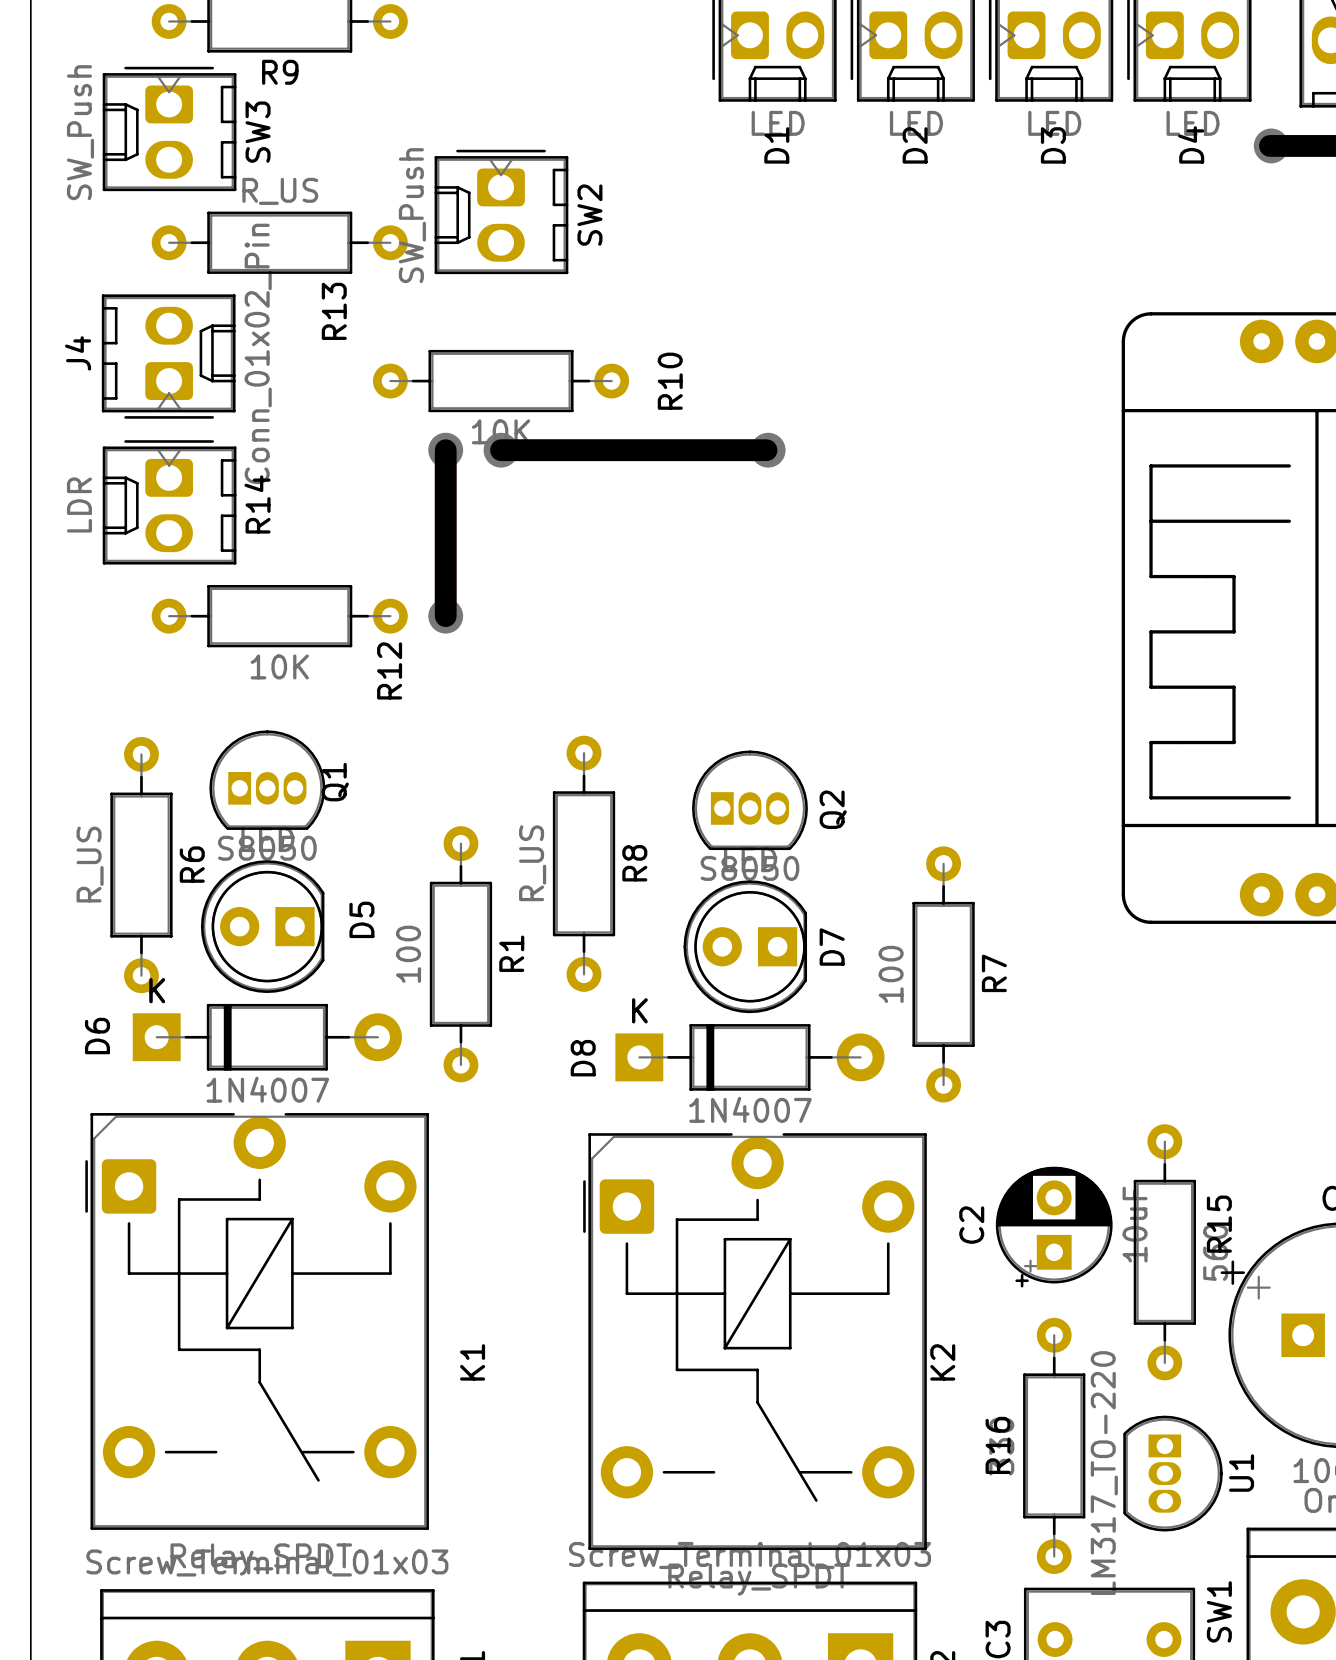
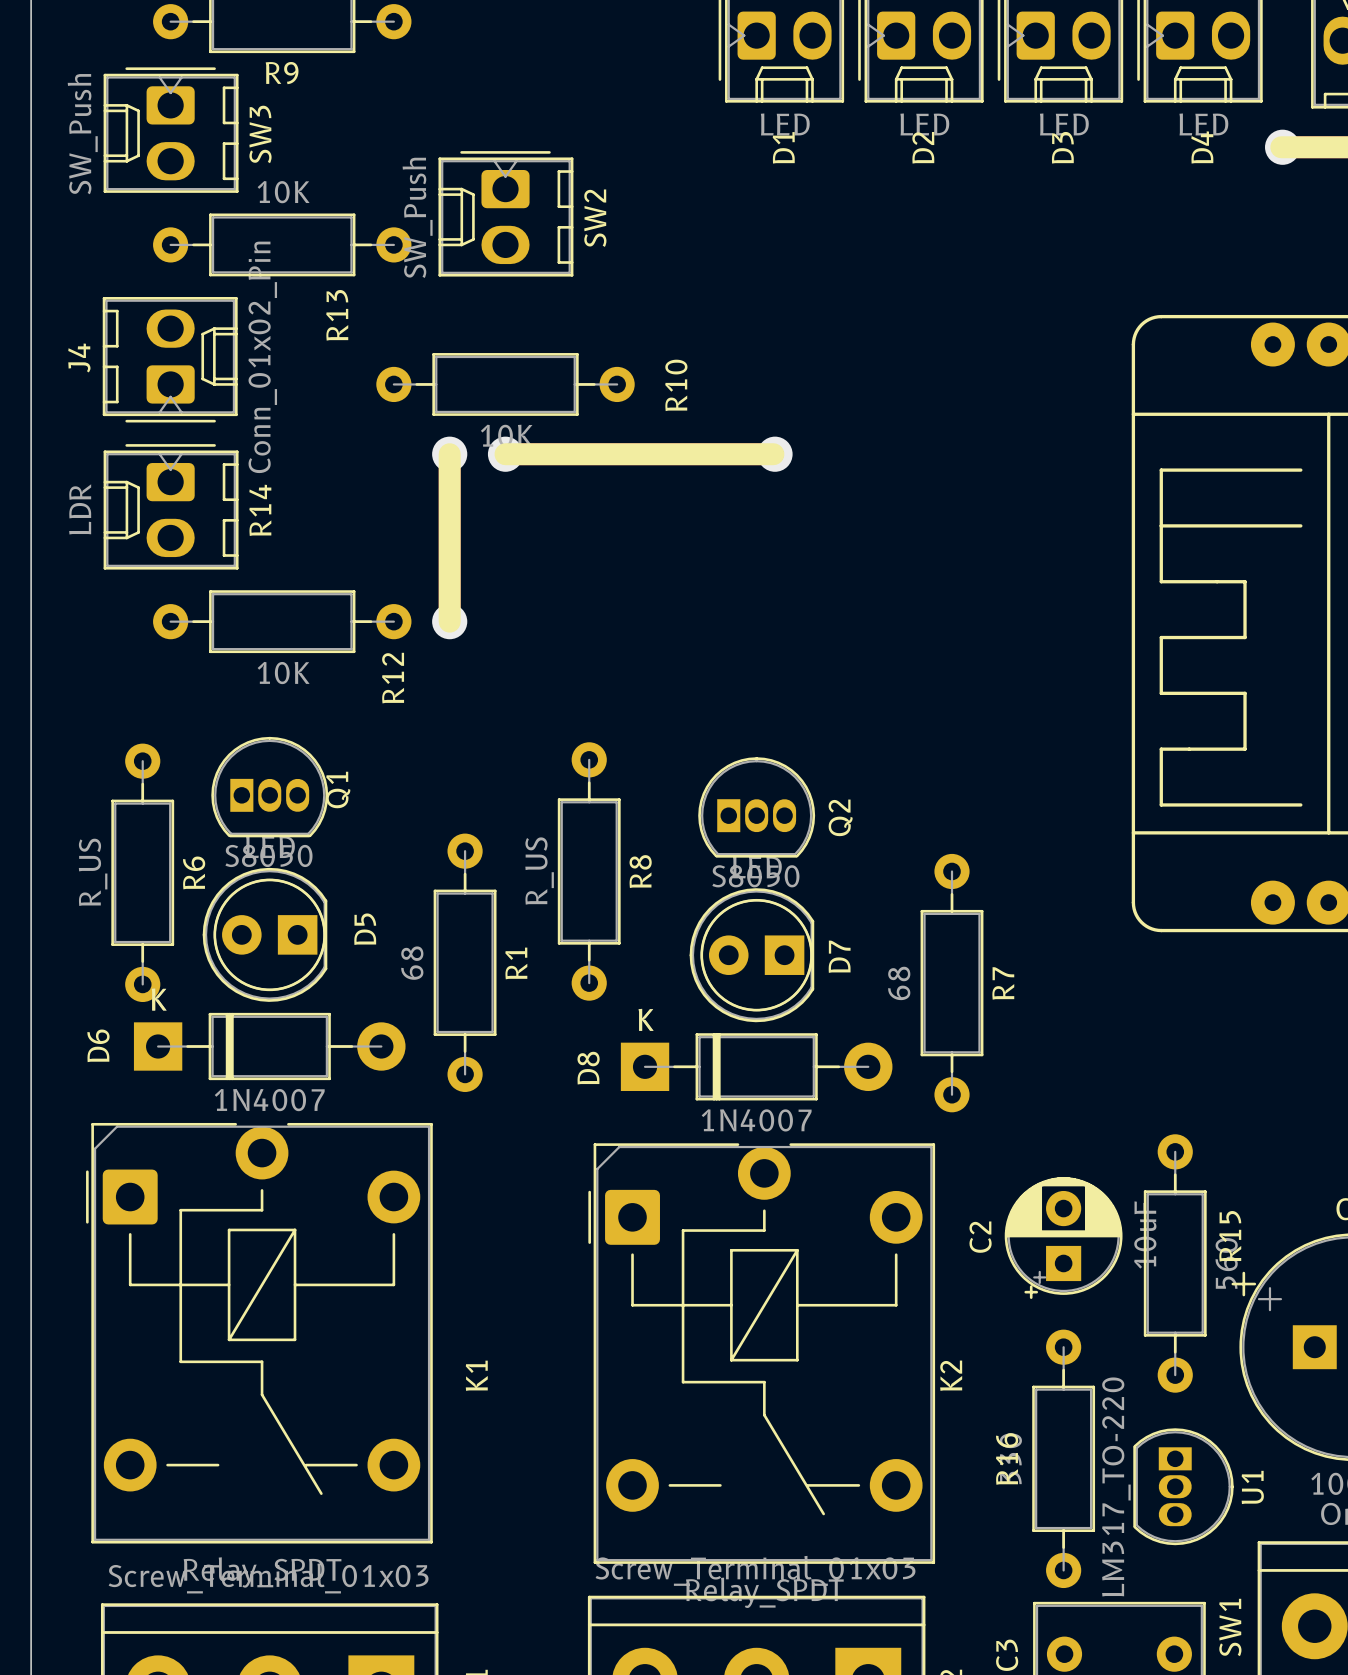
R13 value: R_US (280, 191) -> 10K (283, 192)
R1 value: 100 (408, 954) -> 68 (412, 963)
R7 value: 100 (891, 974) -> 68 (899, 983)

